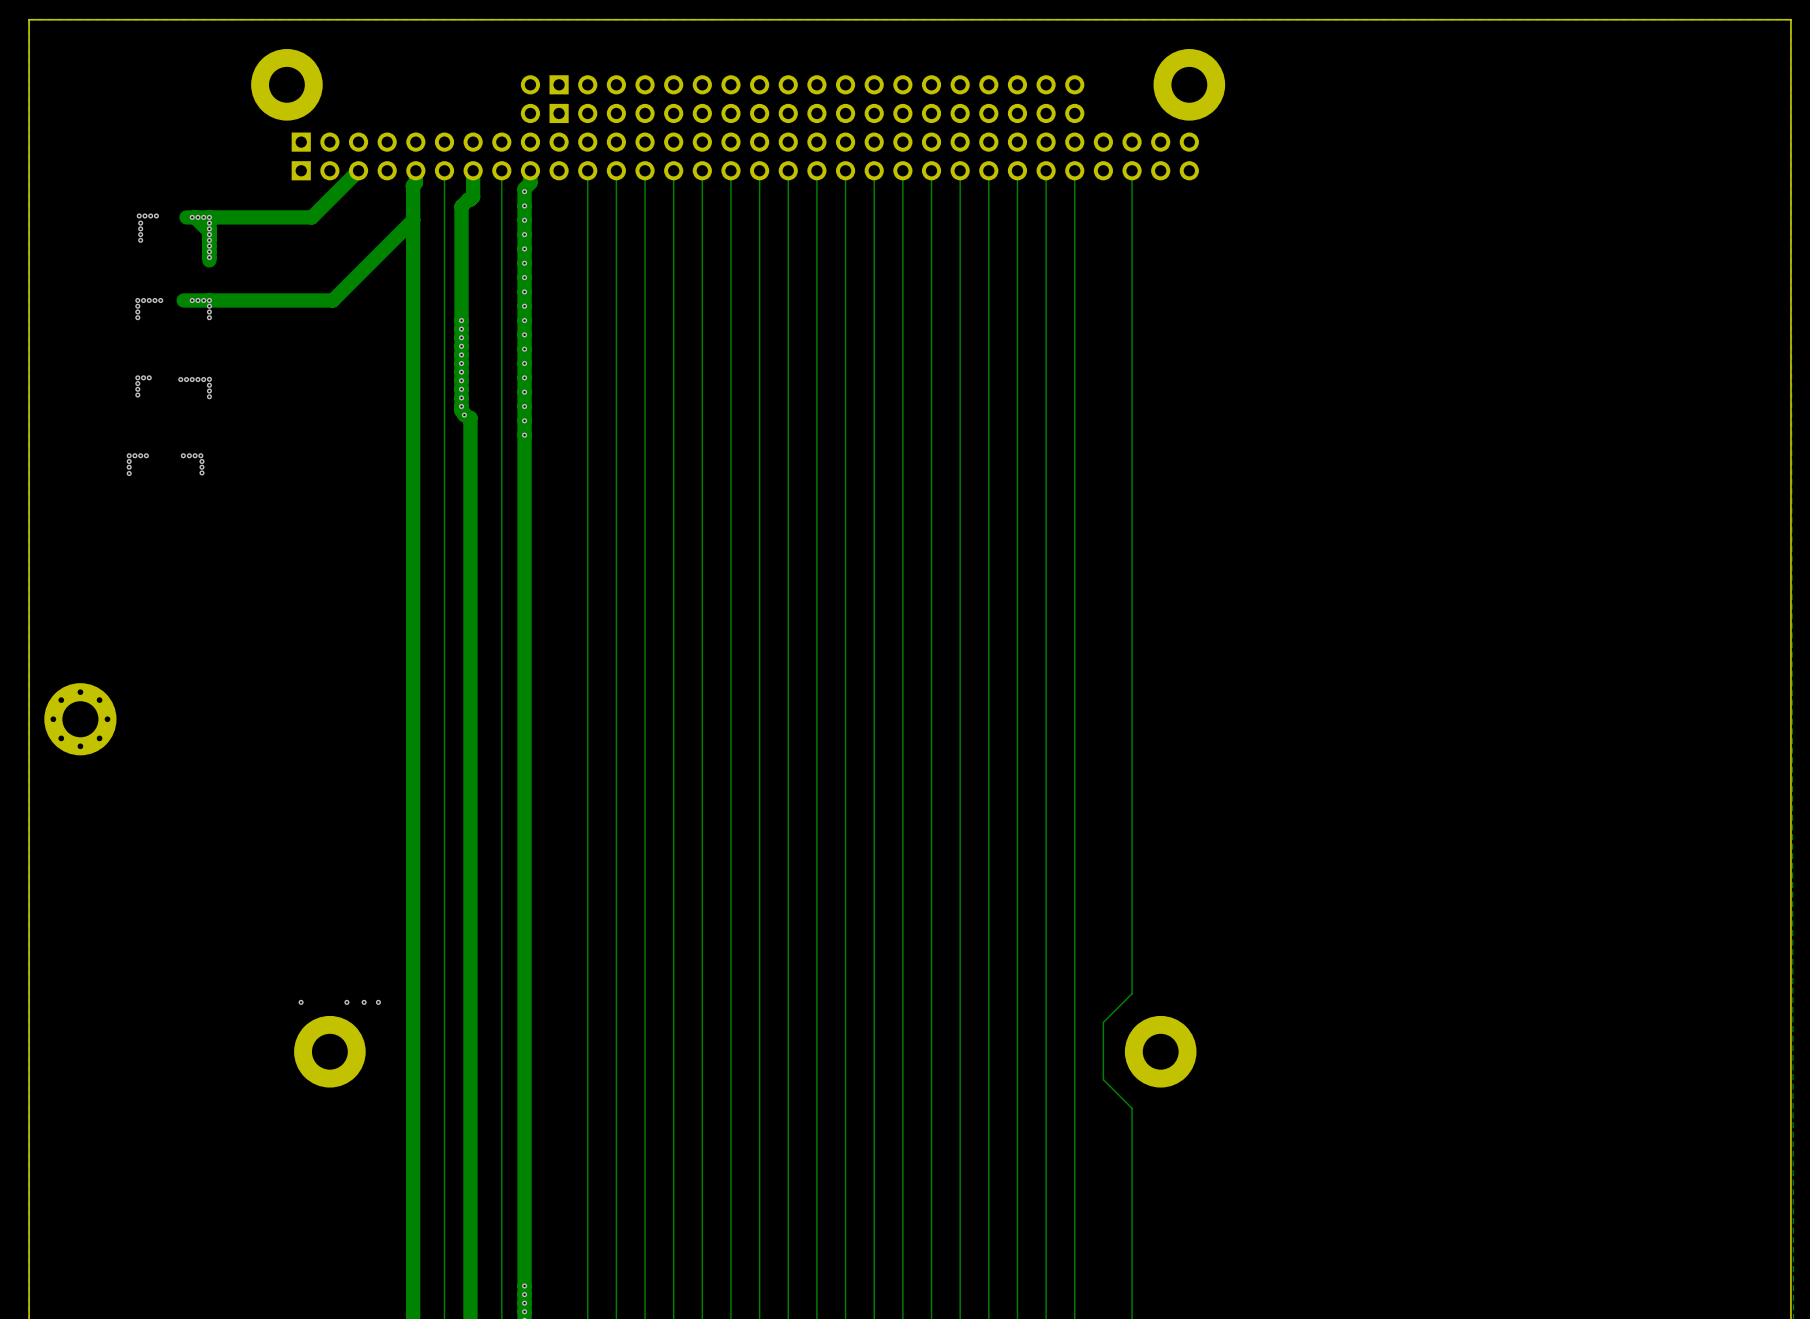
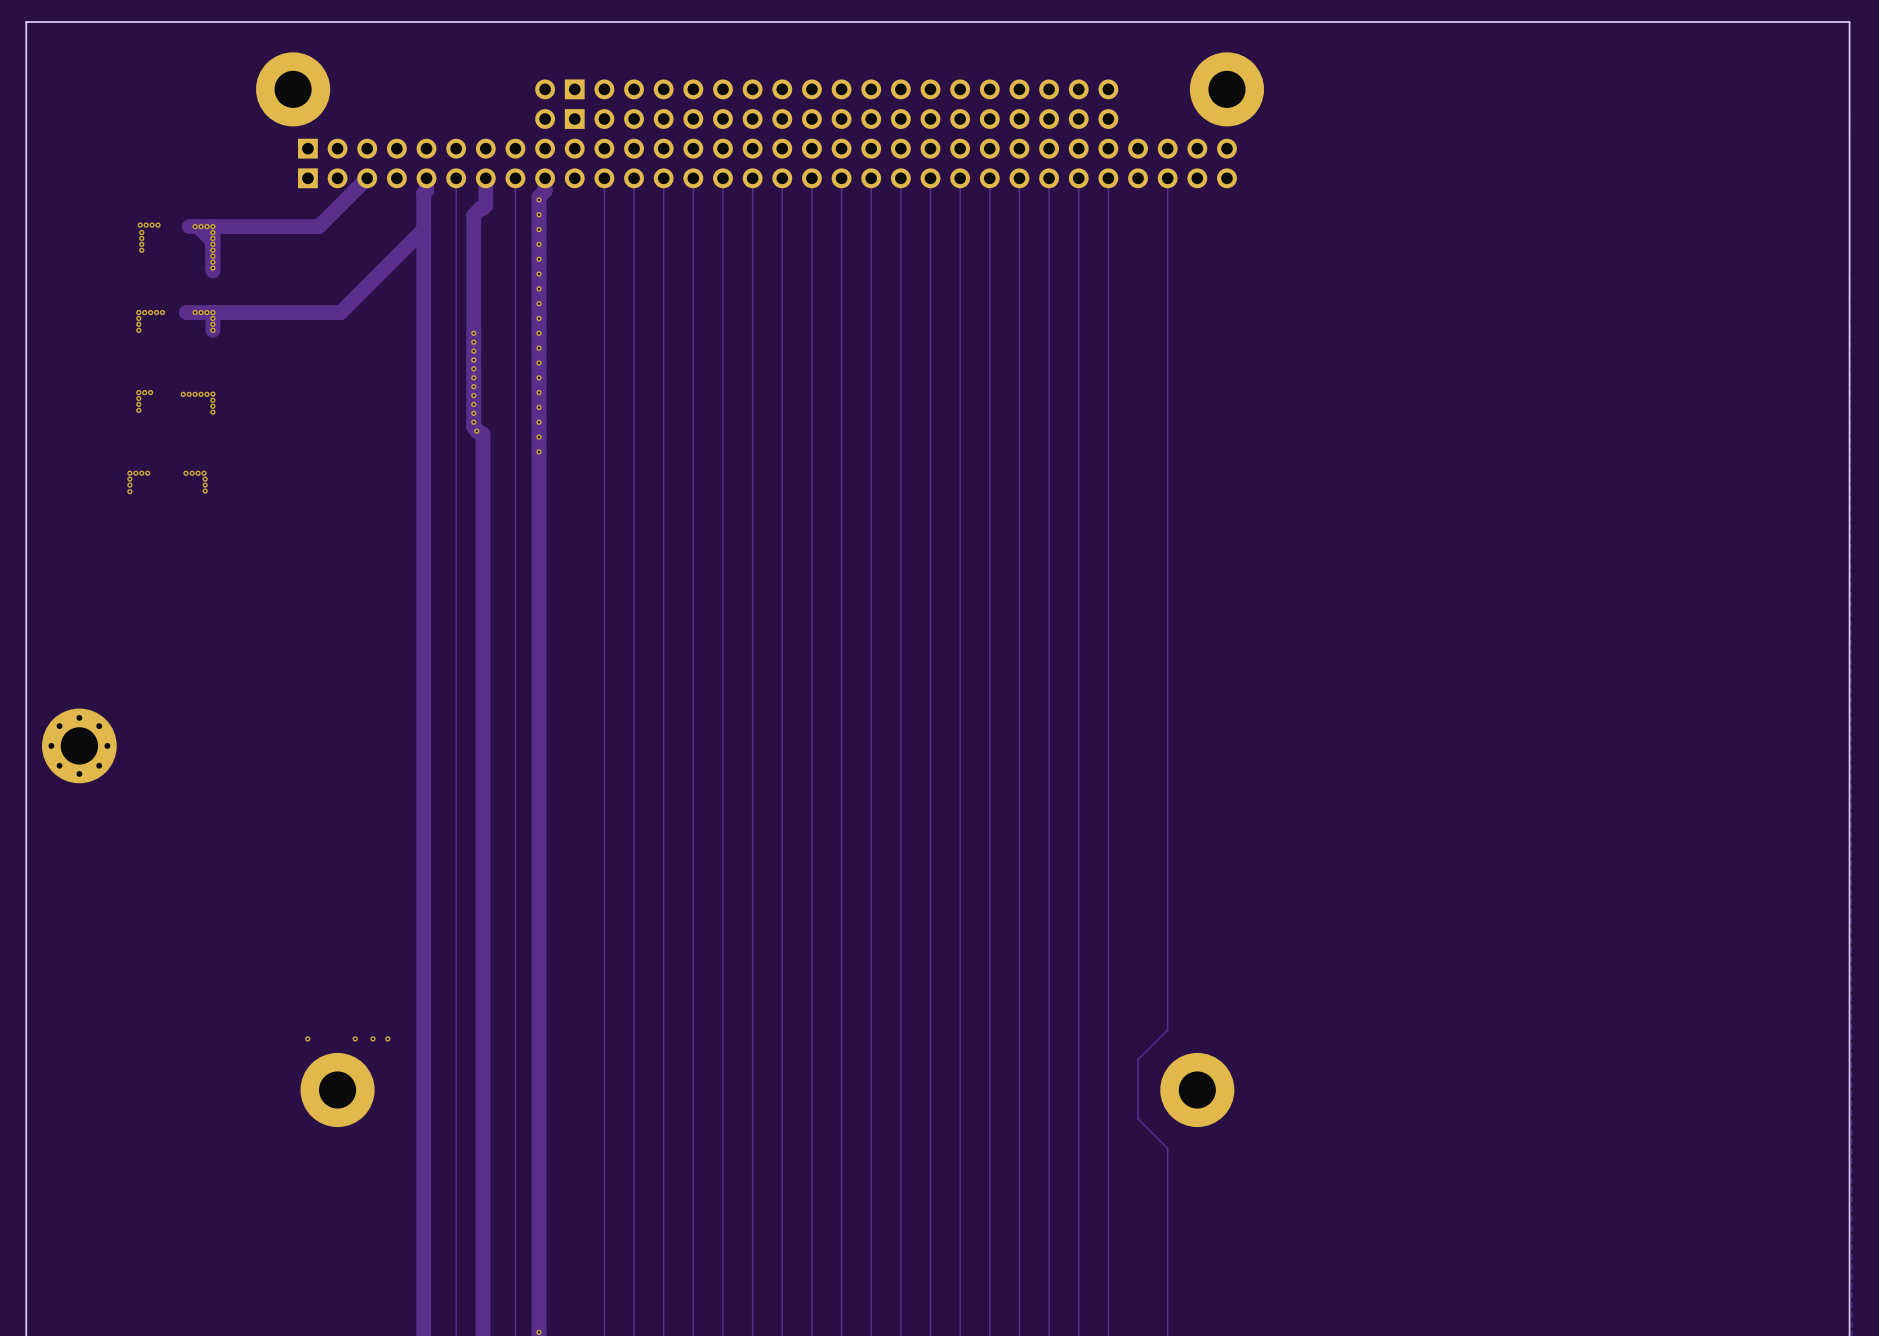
track: none -> (212, 312) (212, 330)

